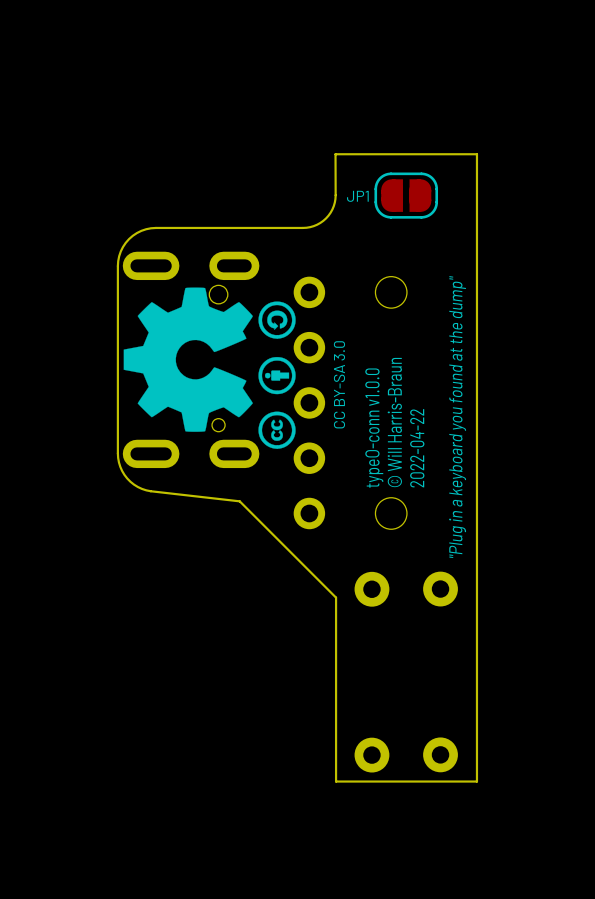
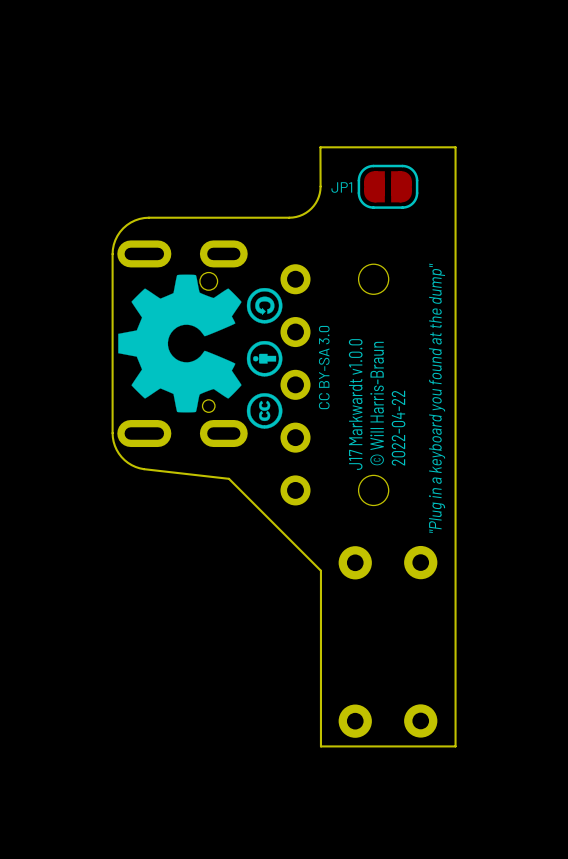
text: typeO-conn v1.0.0 (374, 428) -> J17 Markwardt v1.0.0 (355, 404)

